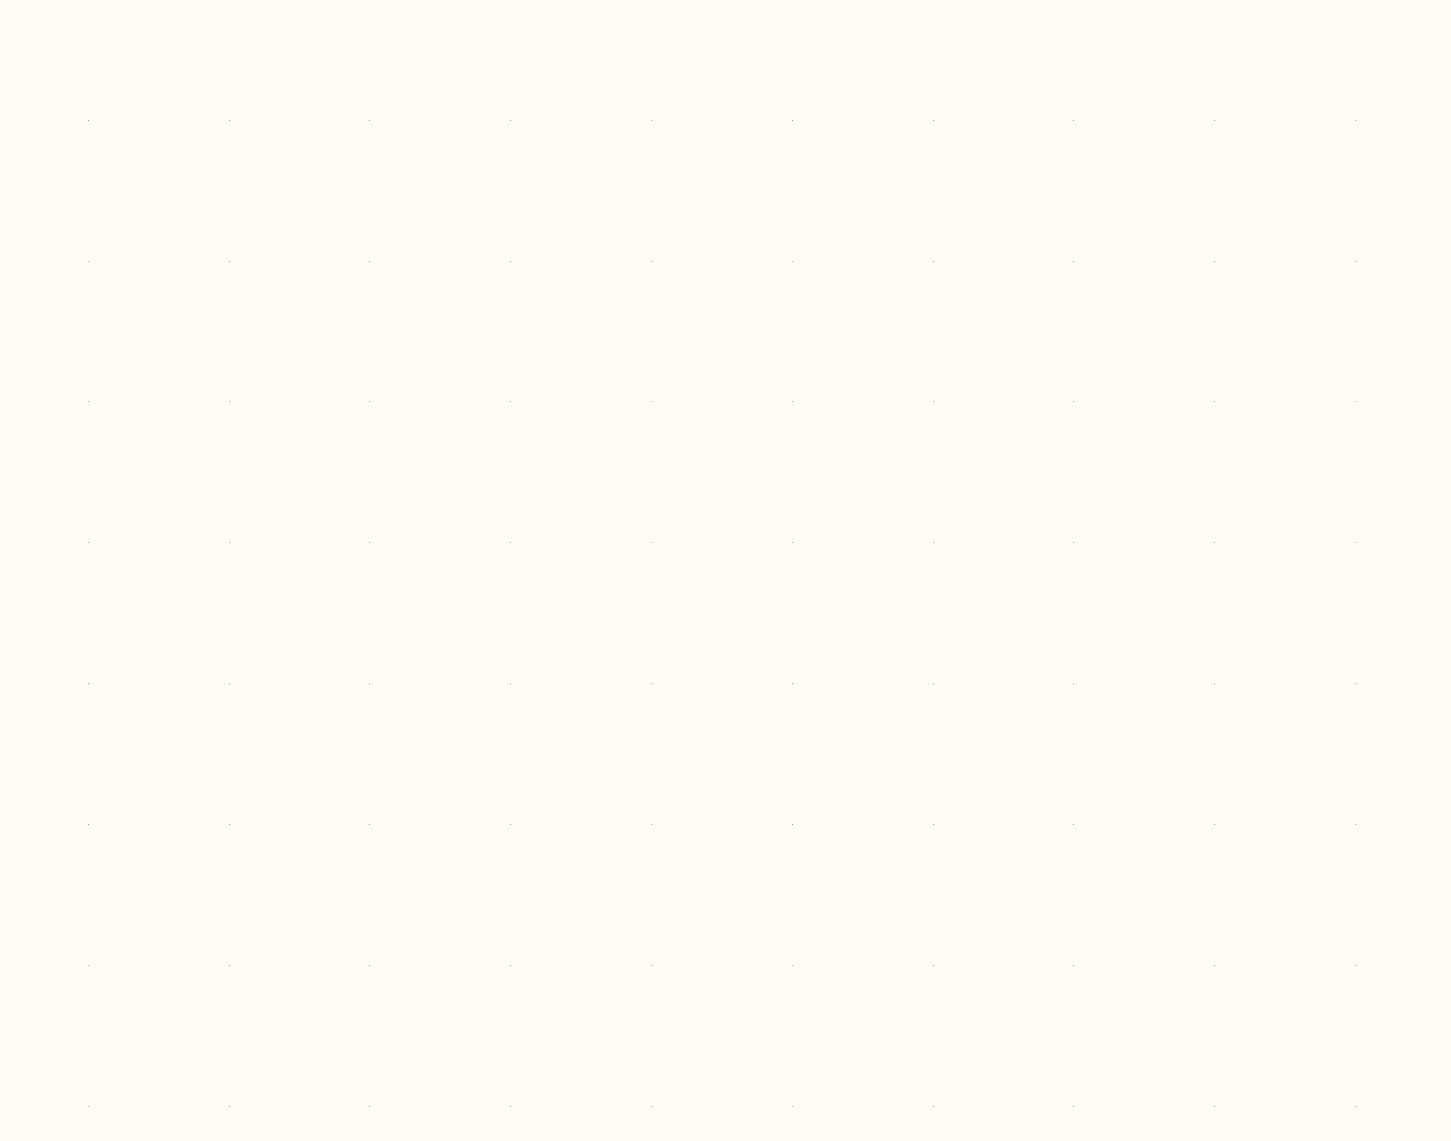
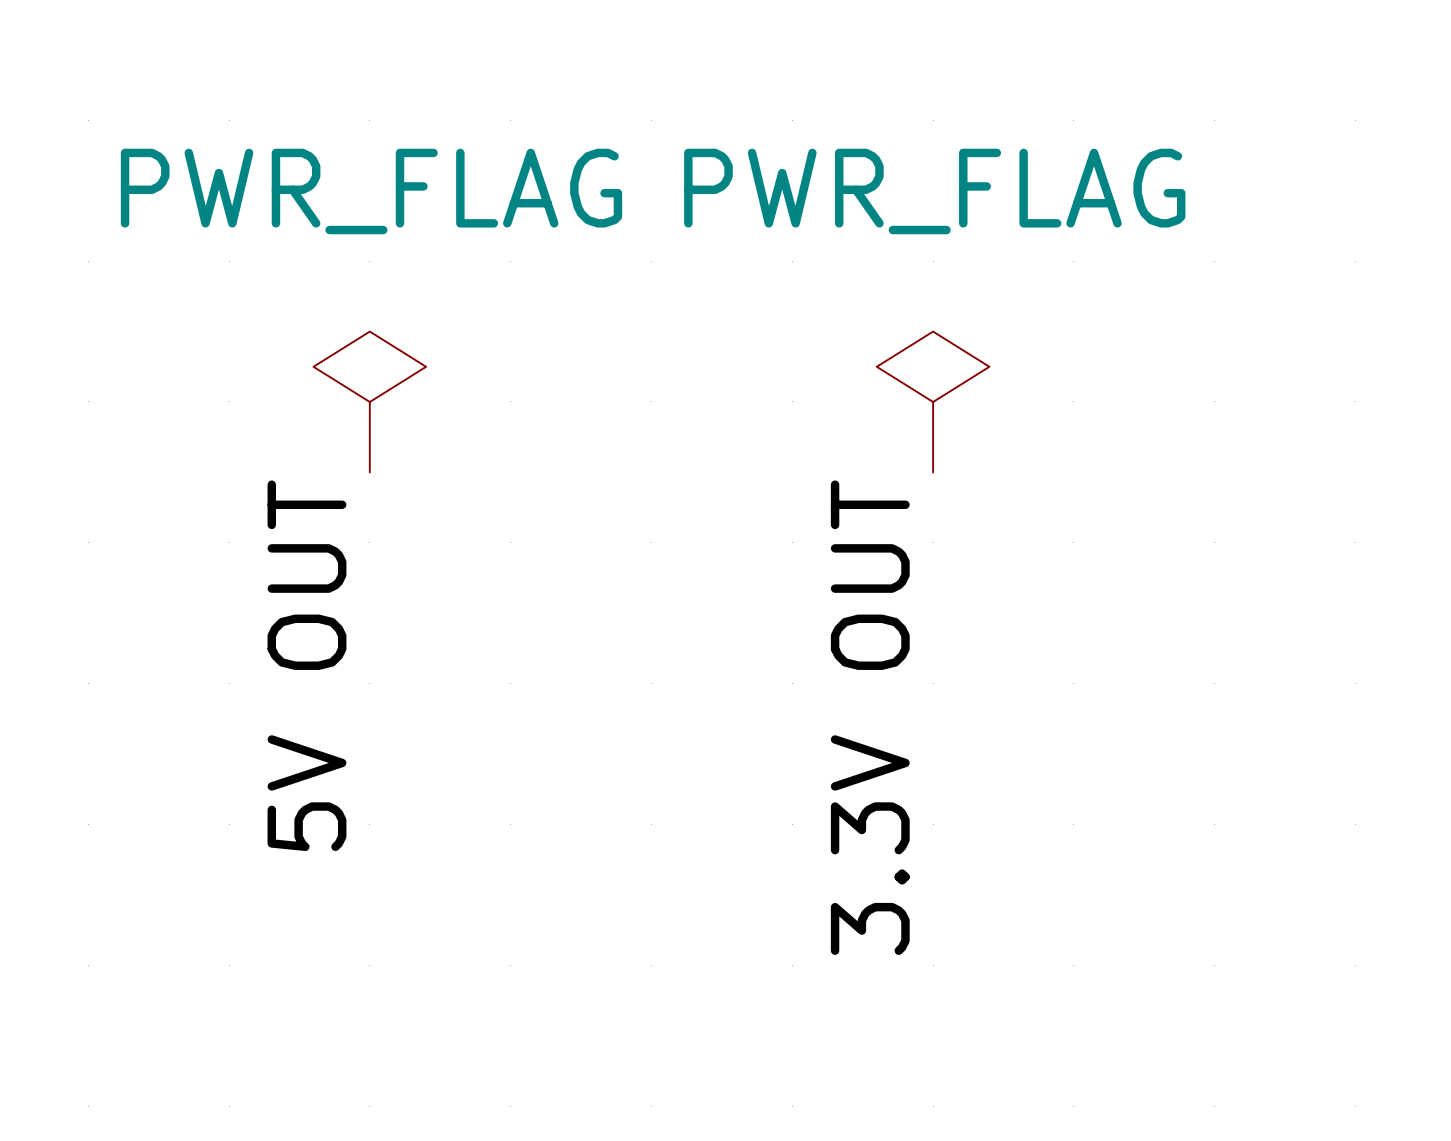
power symbol: none -> PWR_FLAG (369, 401)
power symbol: none -> PWR_FLAG (933, 401)
label: none -> 5V OUT (306, 665)
label: none -> 3.3V OUT (870, 717)

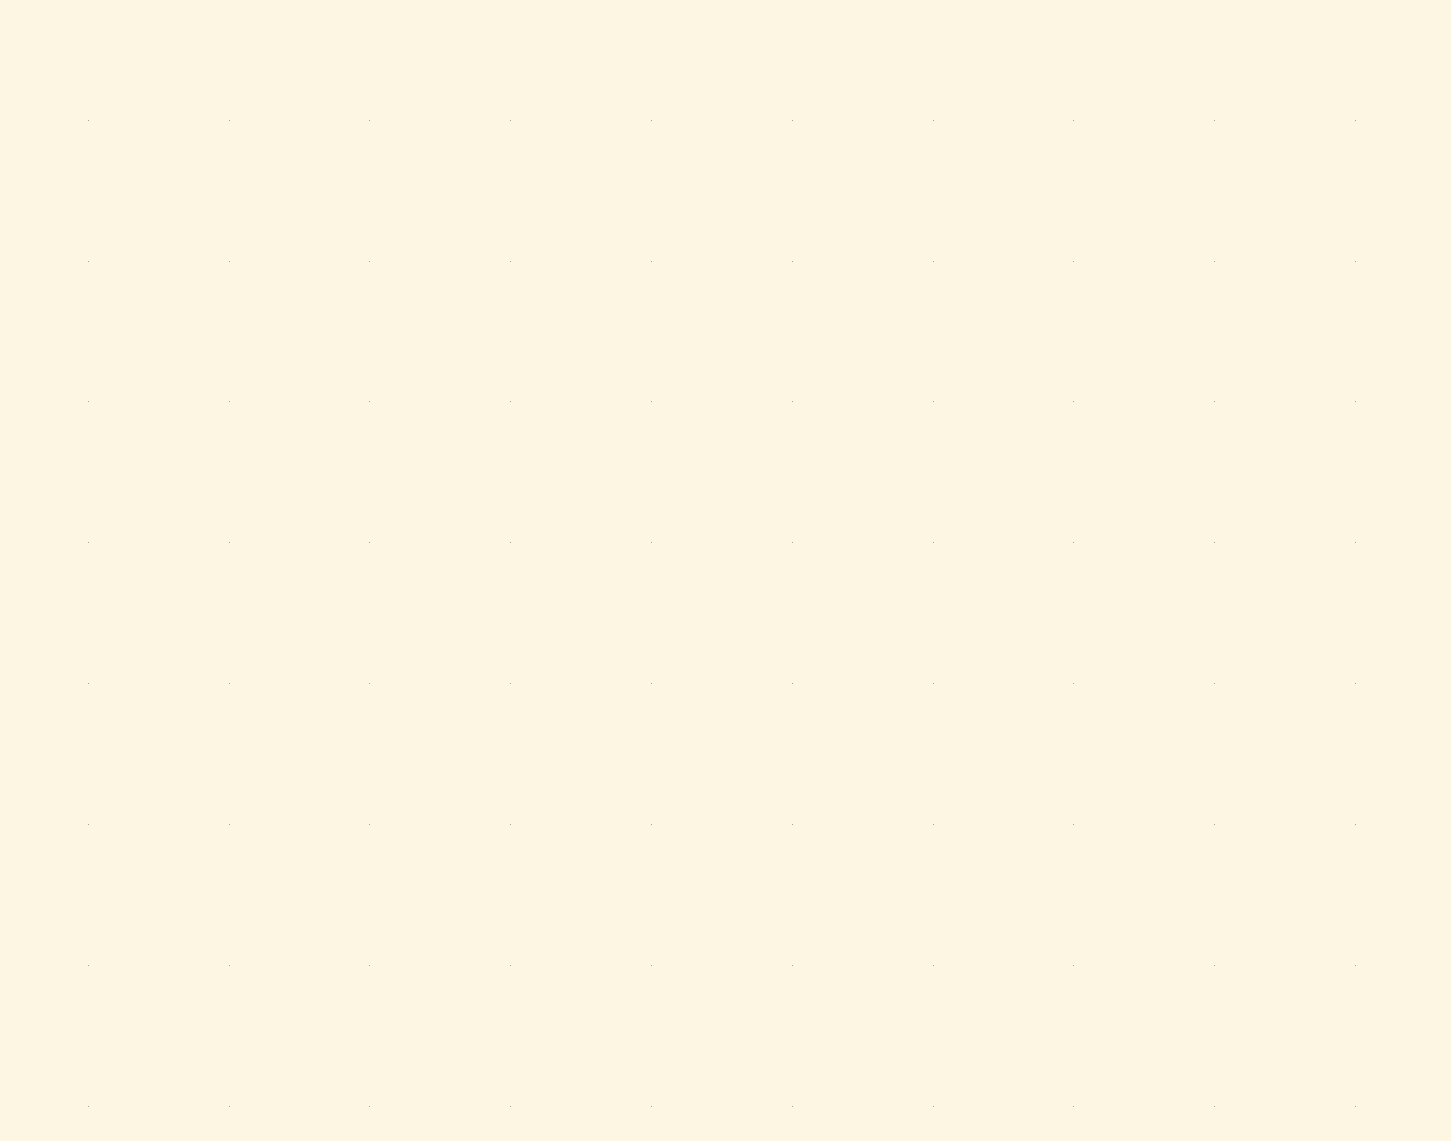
power symbol: PWR_FLAG (369, 401) -> none
power symbol: PWR_FLAG (933, 401) -> none
label: 5V OUT (306, 665) -> none
label: 3.3V OUT (870, 717) -> none

